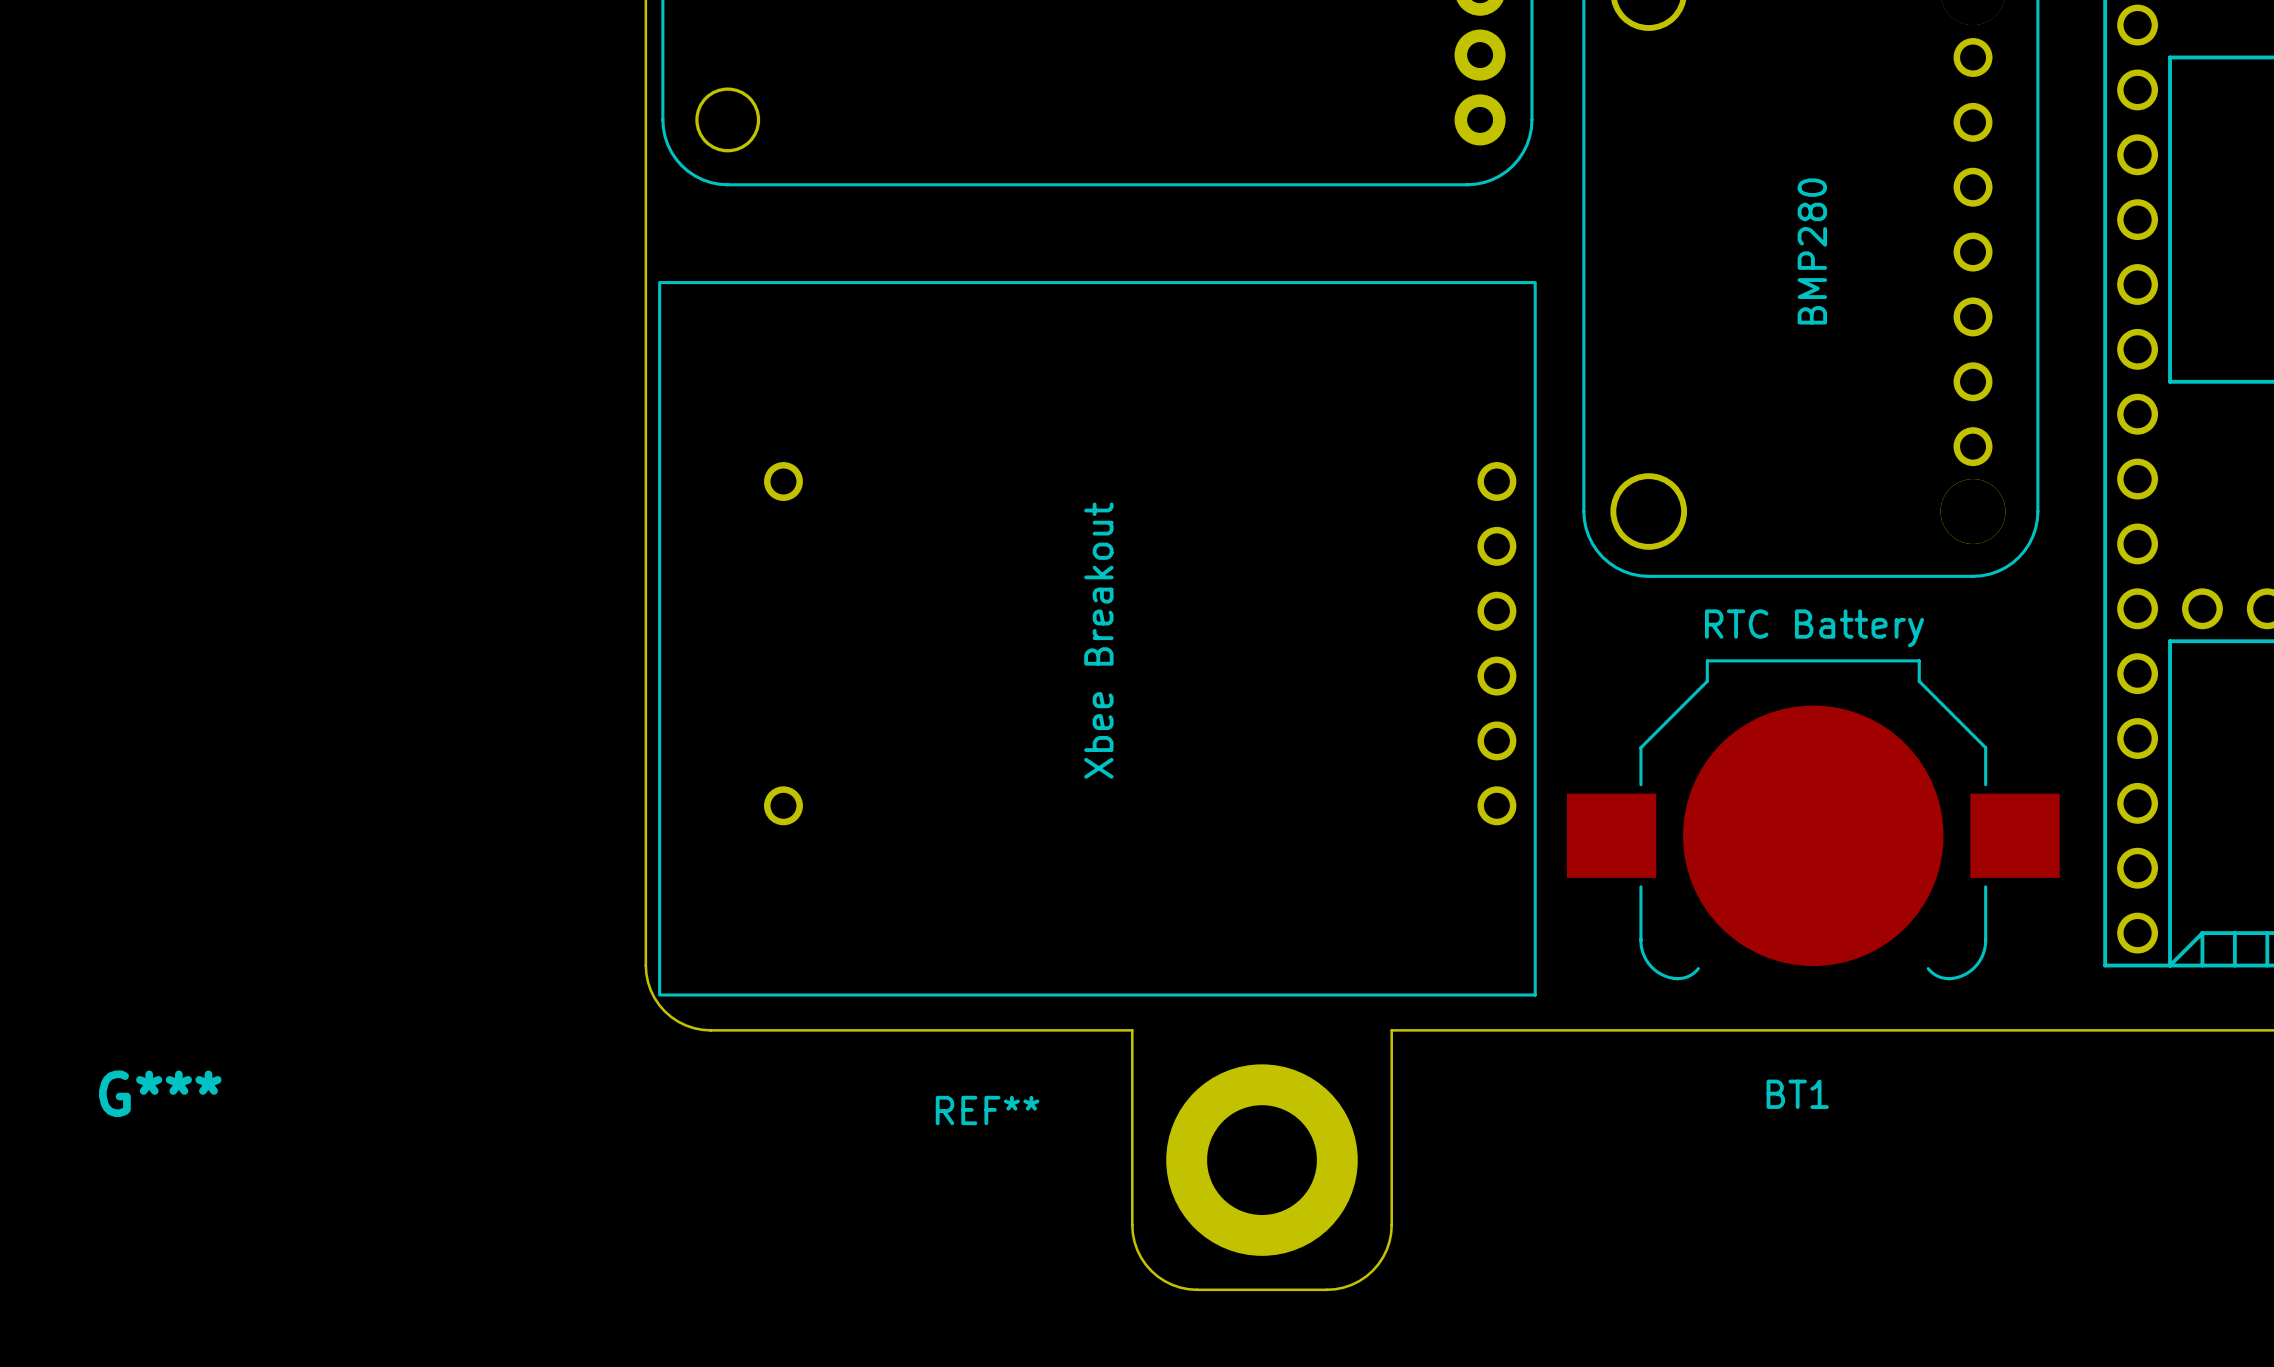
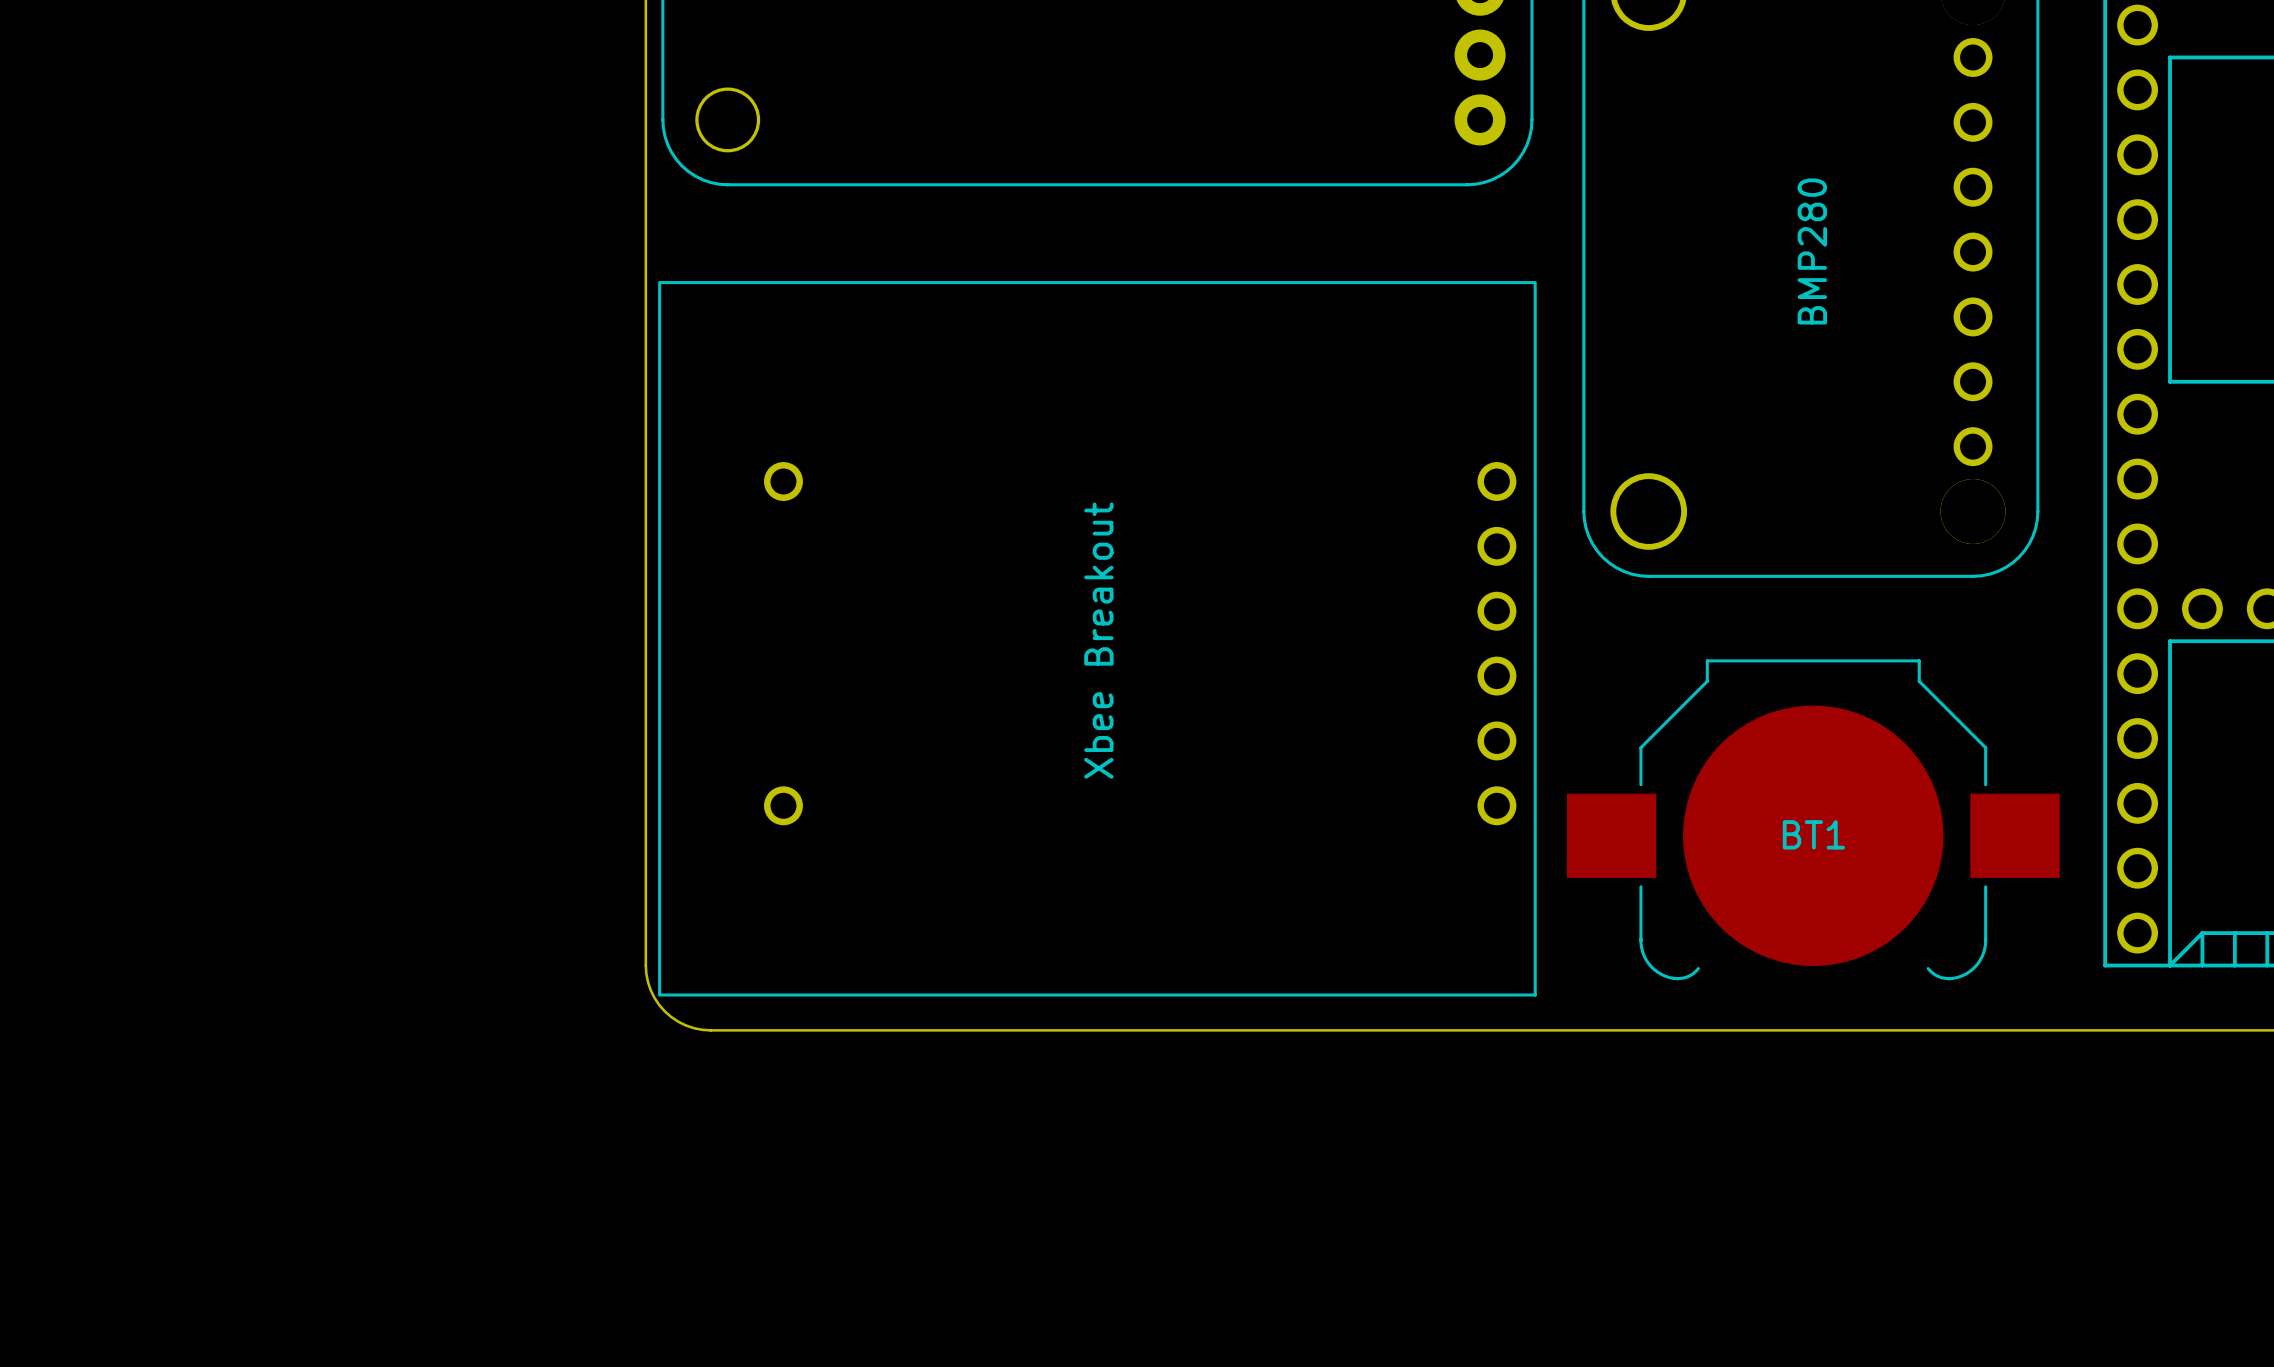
text: RTC Battery (1814, 628) -> none
board edge: (1132, 1030) (1132, 1224) (1134, 1241) (1145, 1264) (1157, 1276) (1172, 1284) (1197, 1289) (1335, 1289) (1359, 1281) (1378, 1264) (1386, 1249) (1391, 1224) (1391, 1030) -> (1132, 1030) (1391, 1030)
G***: (160, 1093) -> none
BT1 name position: BT1 (1797, 1094) -> BT1 (1813, 834)
REF**: (1261, 1160) -> none

